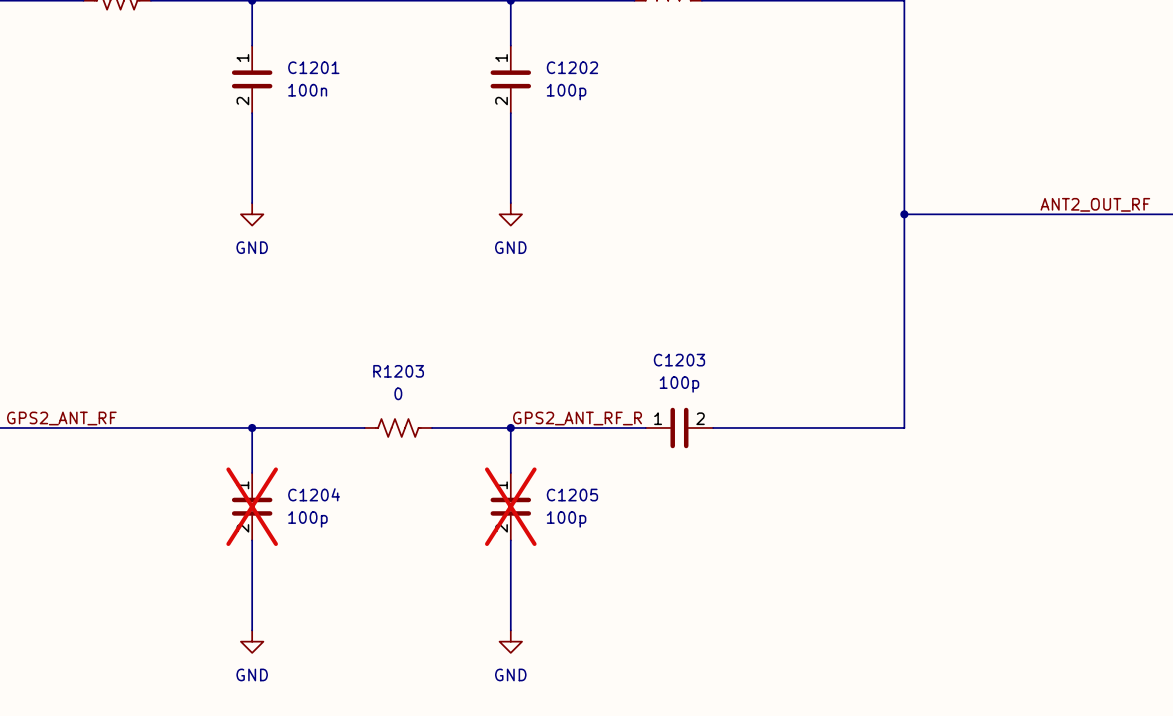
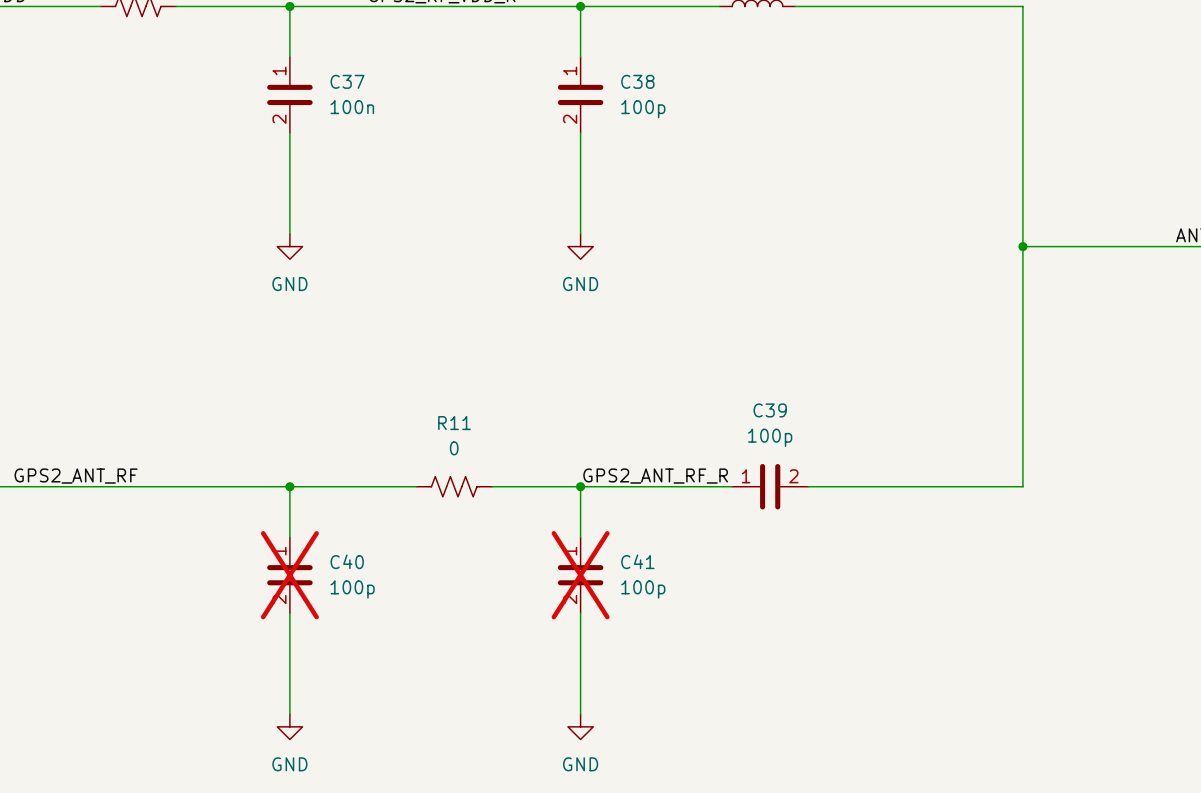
C1201 name: C1201 (313, 67) -> C37 (347, 81)
C1202 name: C1202 (572, 67) -> C38 (637, 81)
C1203 name: C1203 (679, 360) -> C39 (770, 410)
R1203 name: R1203 (398, 371) -> R11 (454, 423)
C1204 name: C1204 (314, 494) -> C40 (347, 561)
C1205 name: C1205 (572, 495) -> C41 (637, 561)

